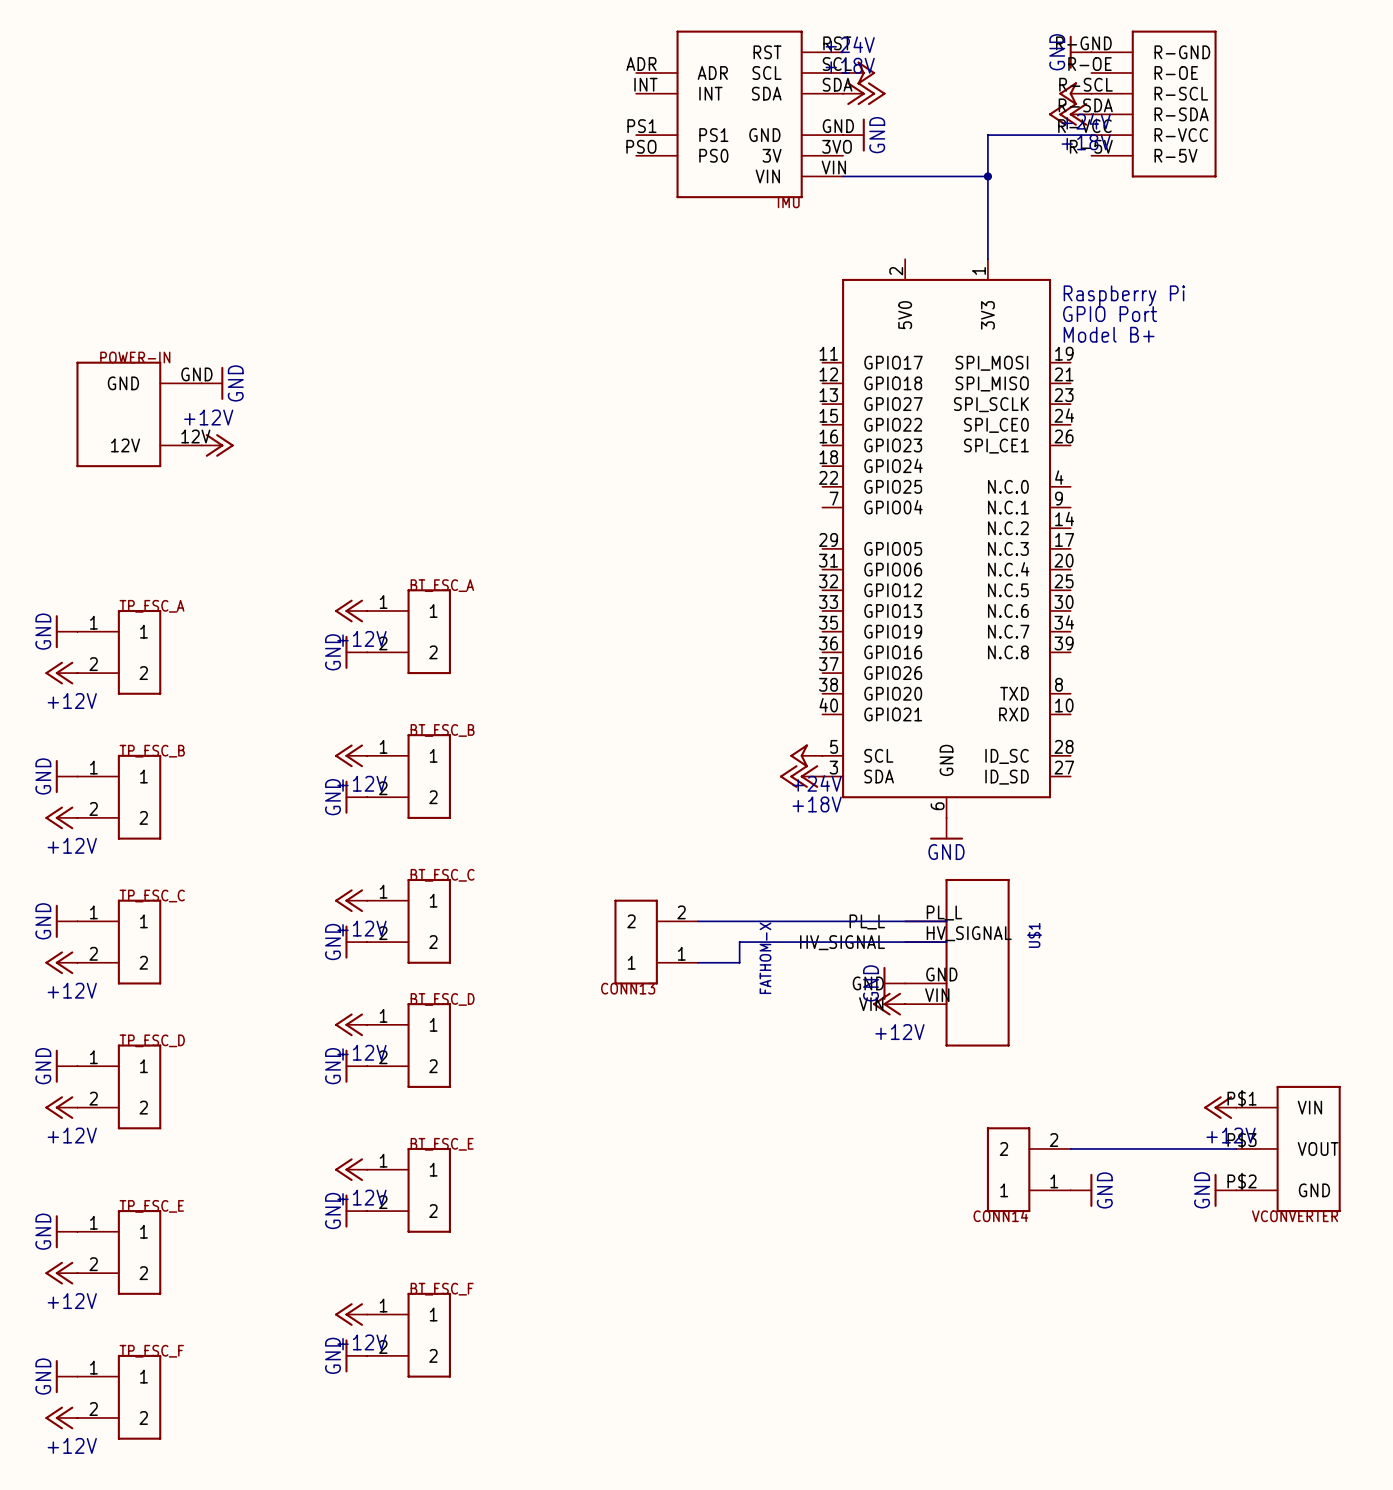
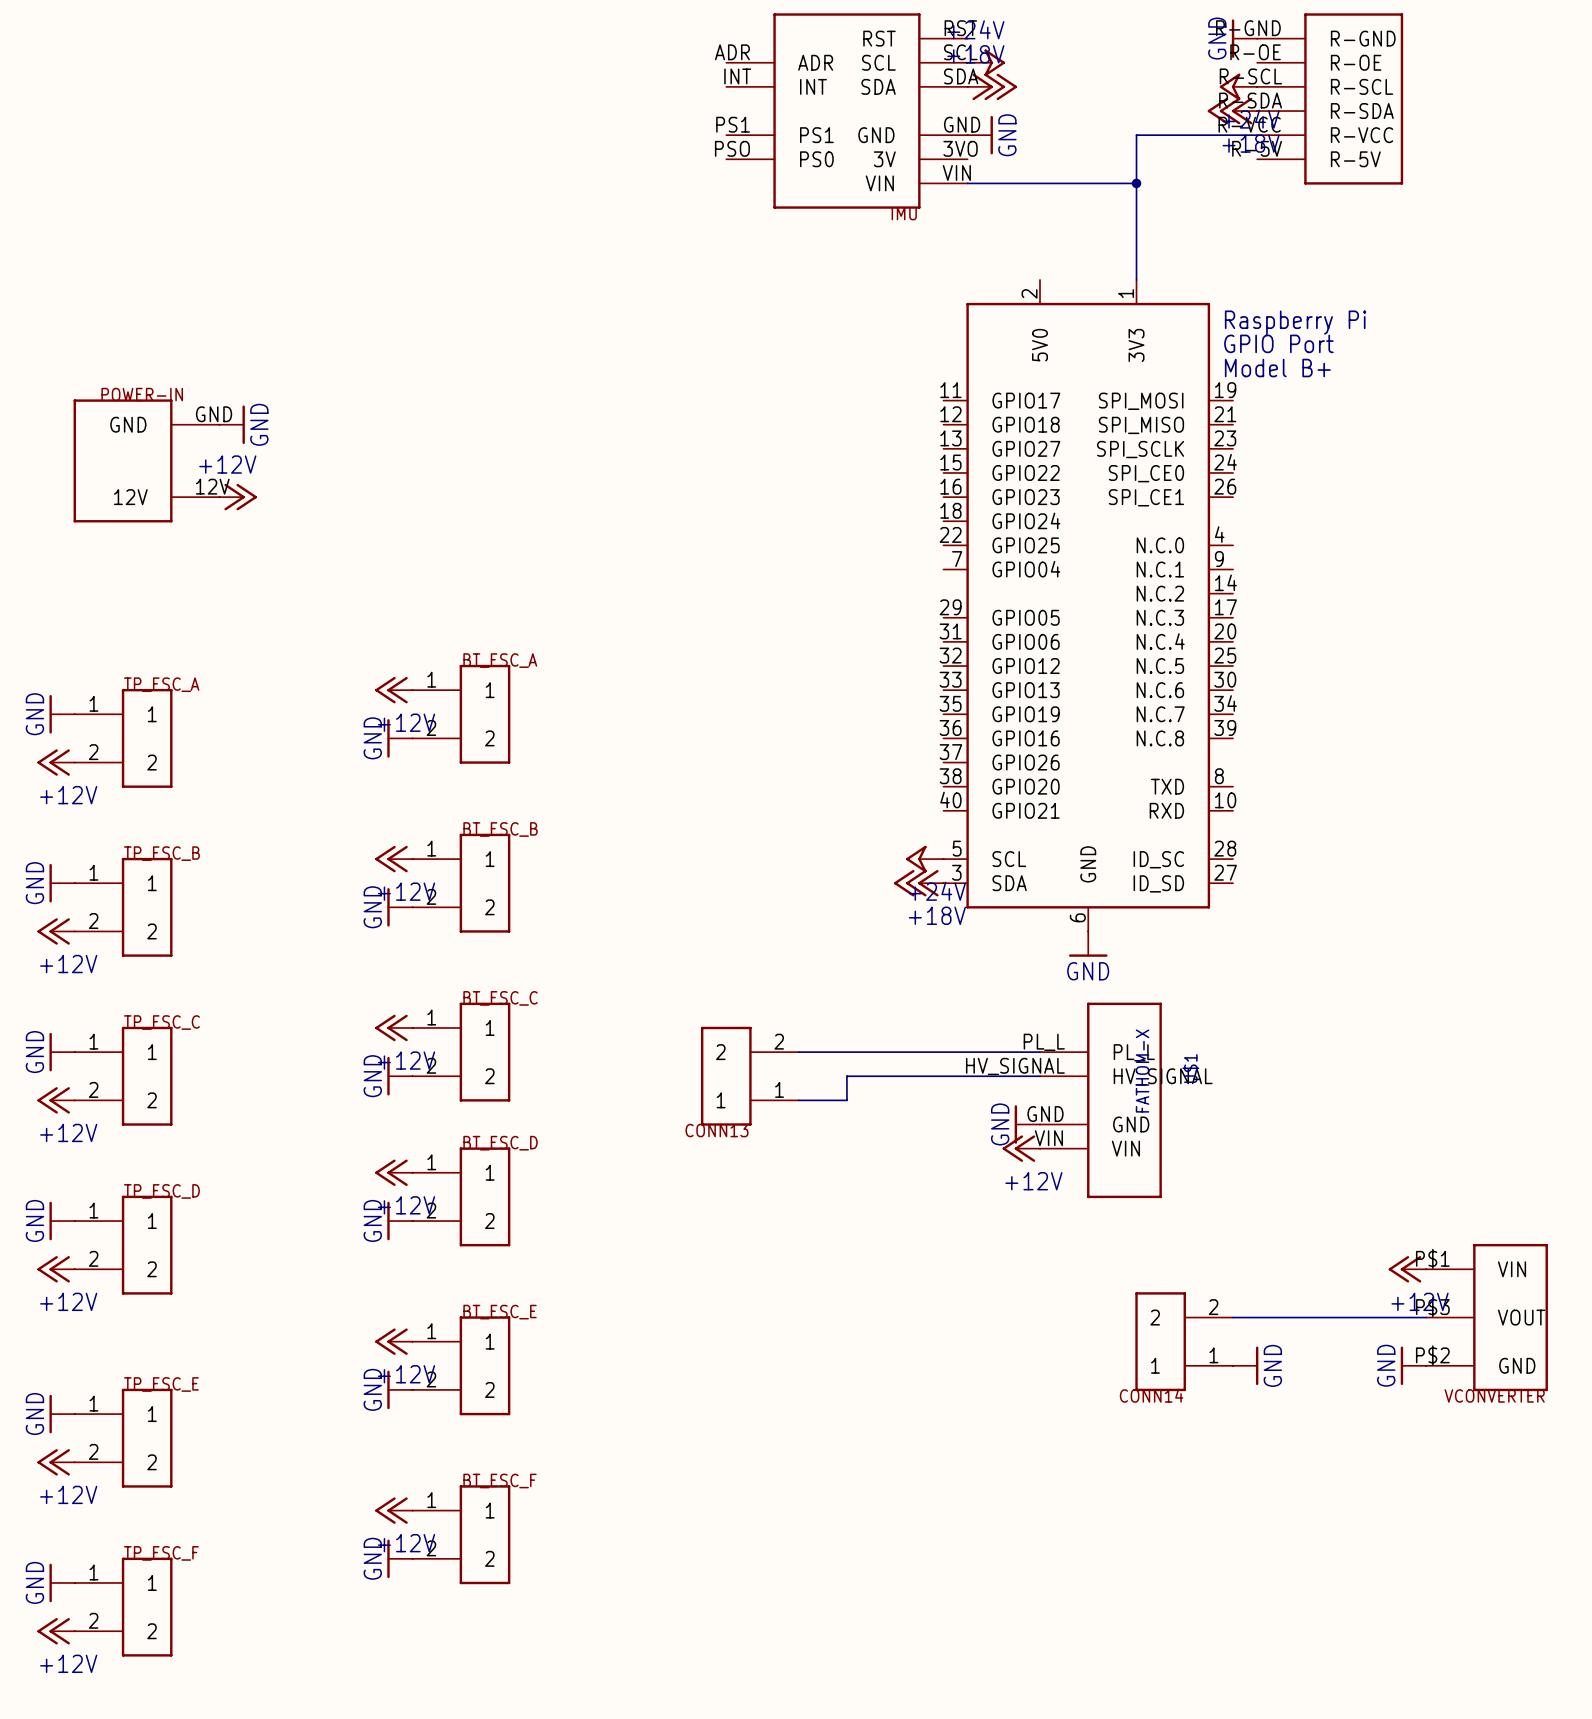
U$1 symbol: [905, 878, 1010, 1047] -> [1039, 1002, 1162, 1199]
U$1 value position: FATHOM-X (765, 958) -> FATHOM-X (1142, 1071)

